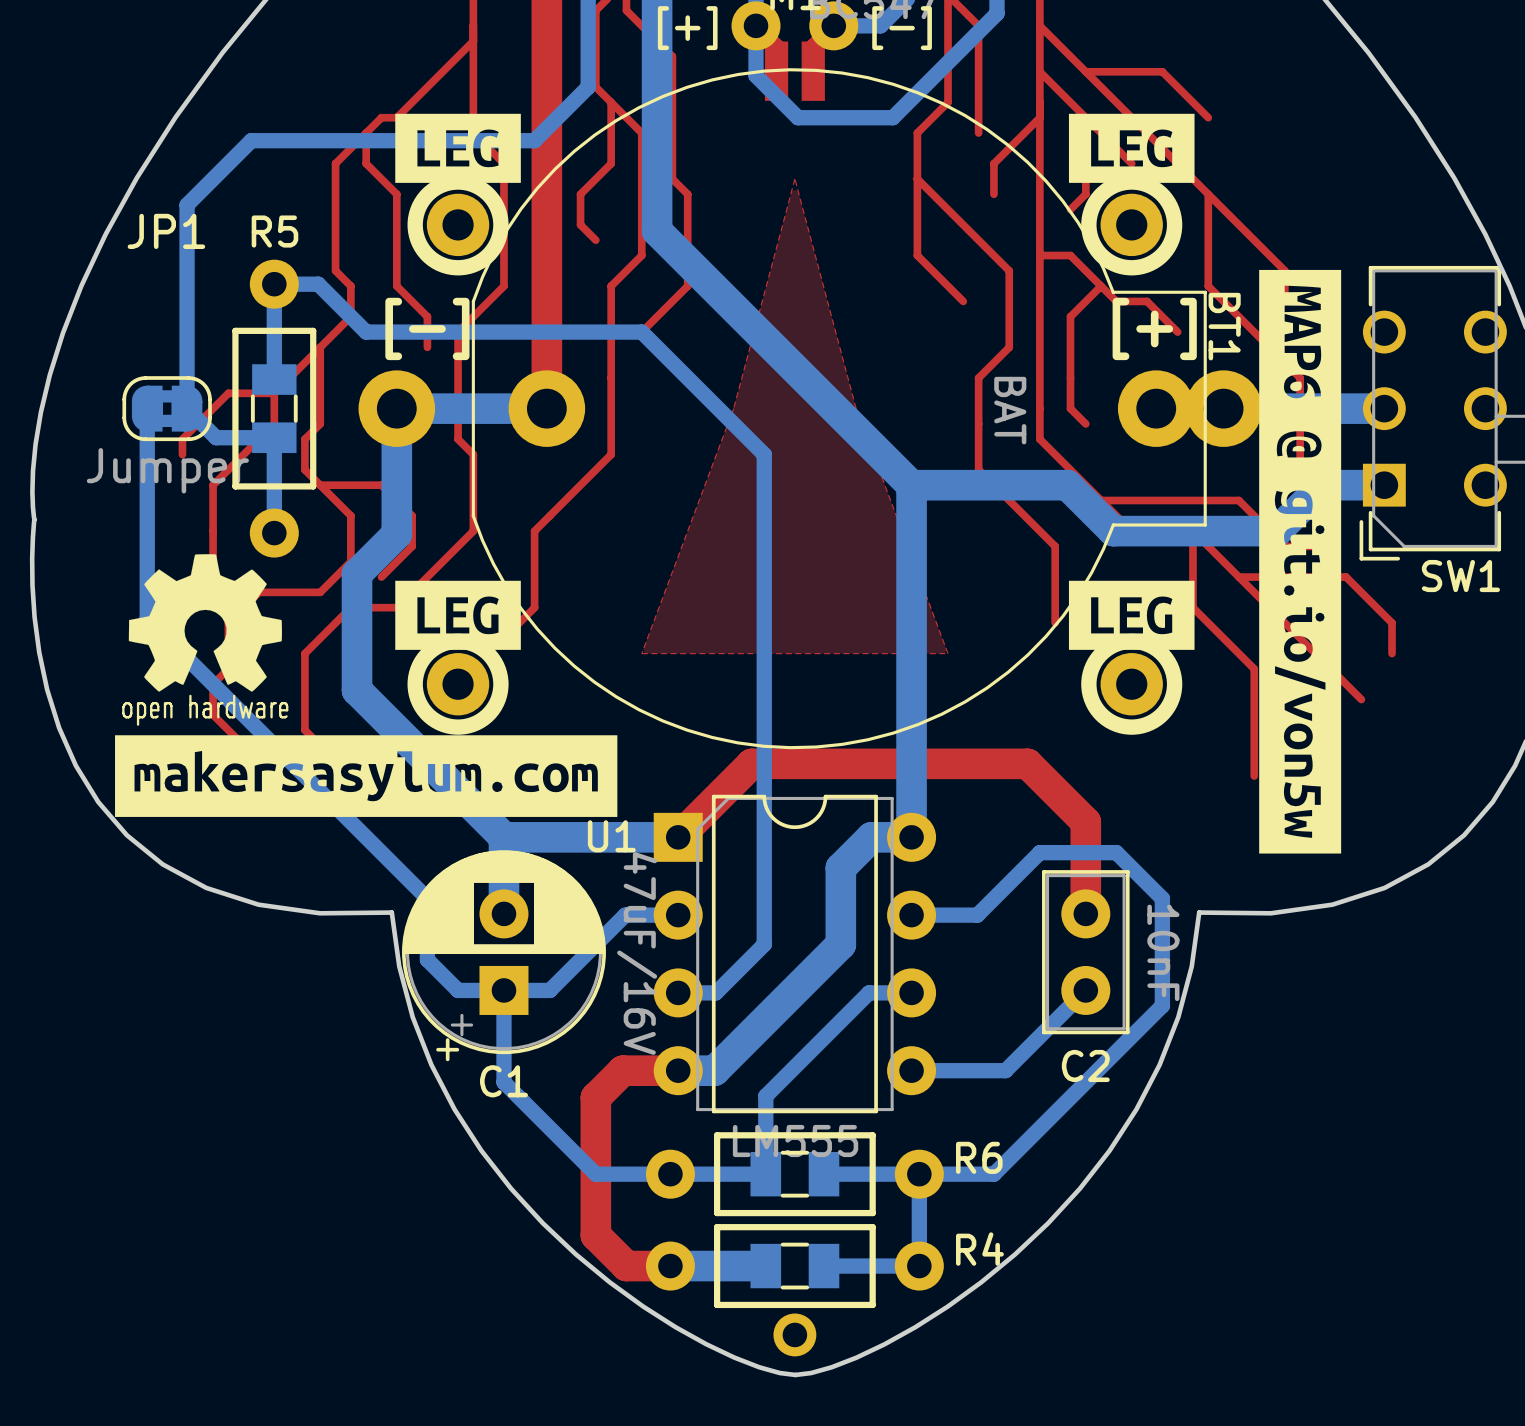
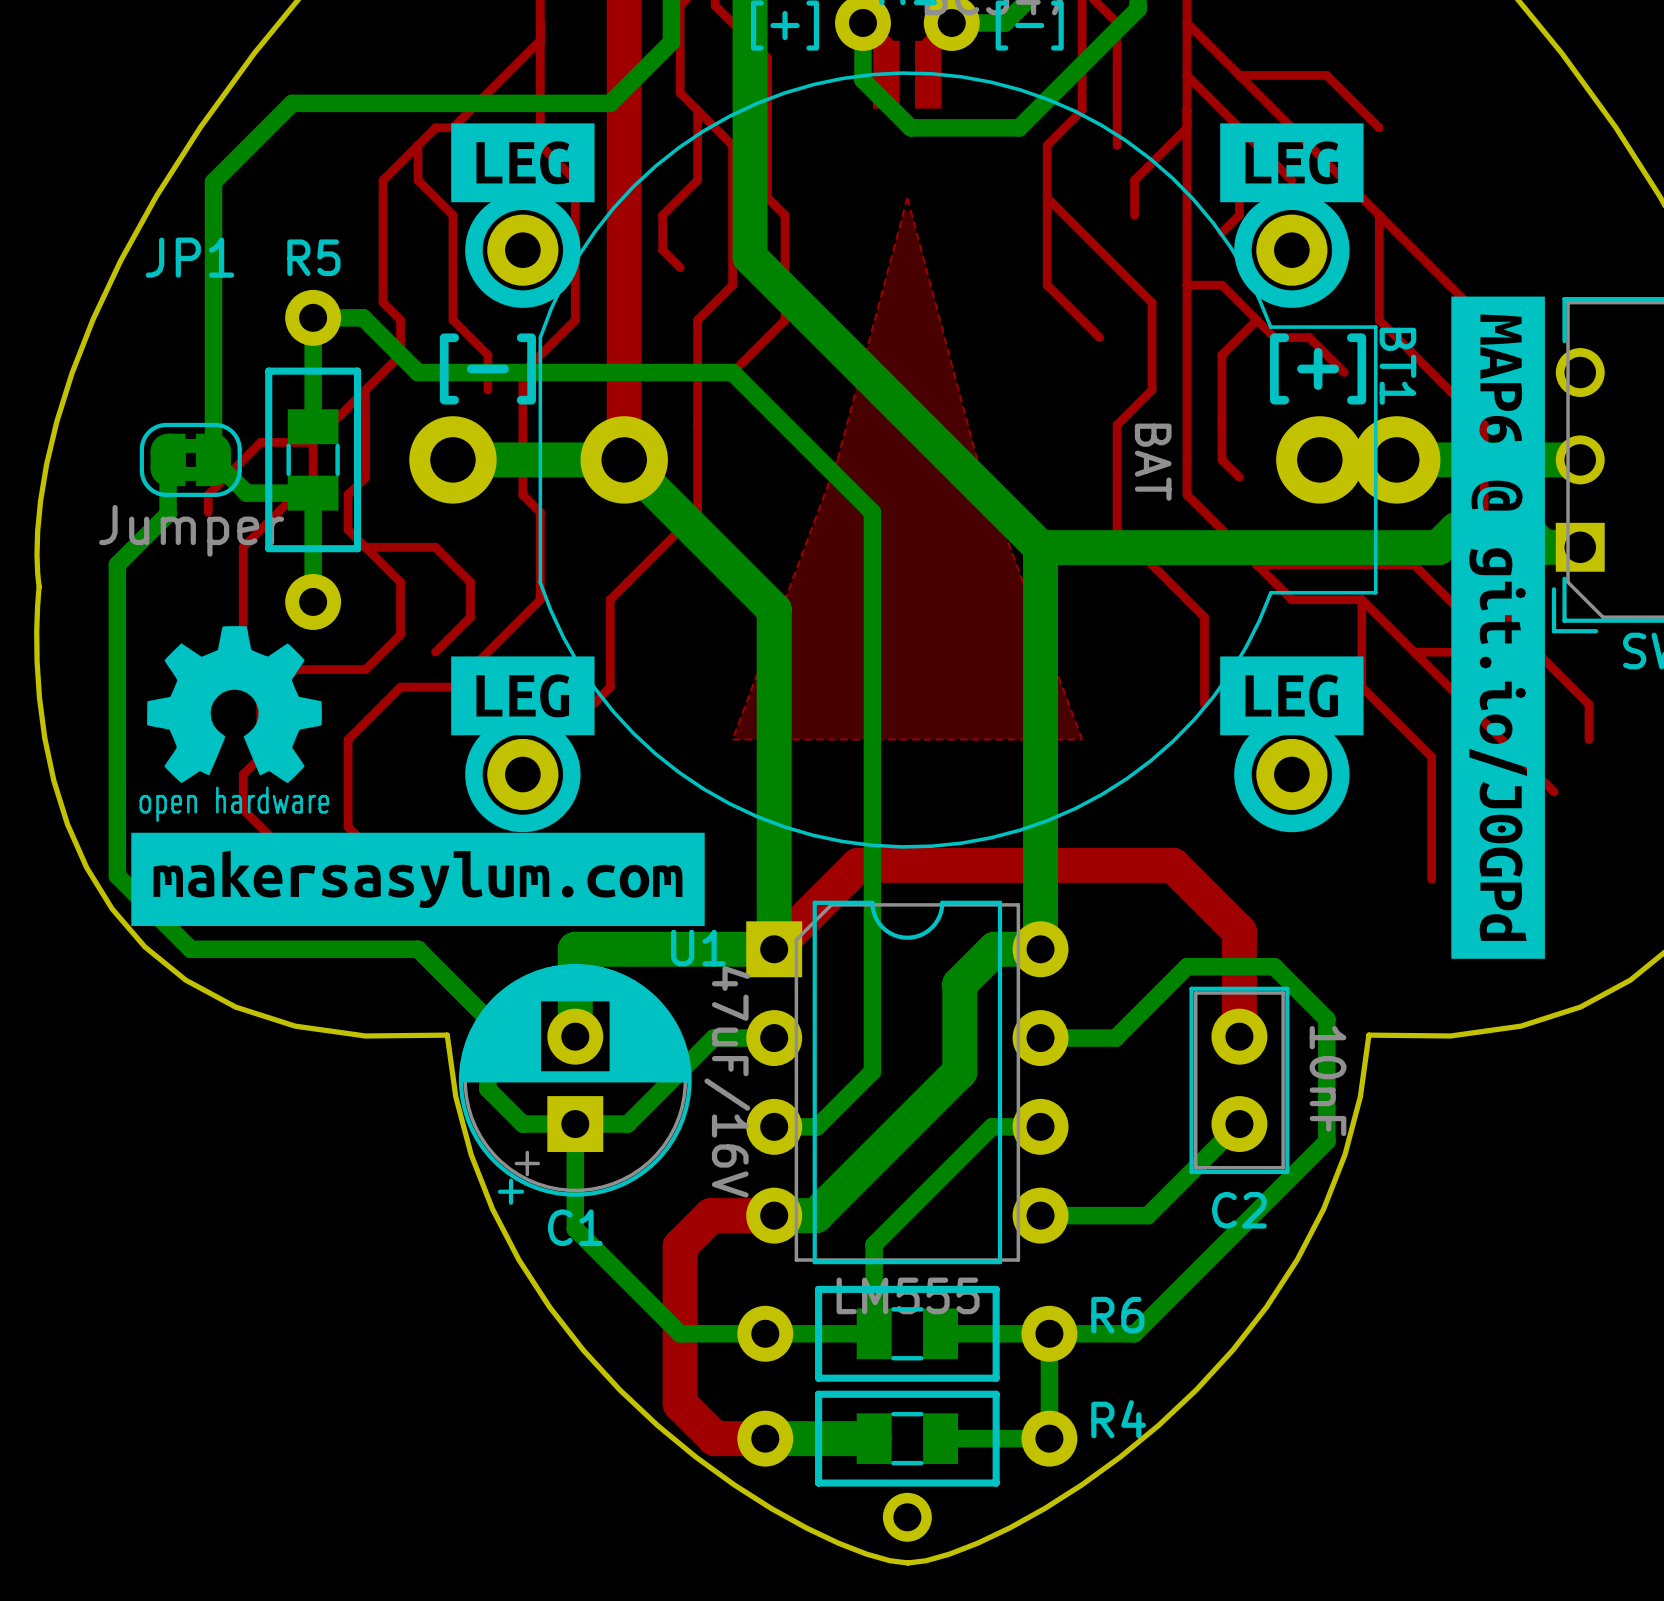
bottom track: (588, 42) (588, 87) (534, 140) (251, 140) (187, 205) -> (671, 42) (610, 103) (292, 103) (213, 182) (213, 227)
drawing shape: [1259, 269, 1342, 854] -> [1451, 296, 1545, 959]
bottom track: (396, 408) (396, 534) (357, 573) (357, 690) (503, 837) -> none
bottom track: none -> (624, 459) (774, 609) (774, 949)
bottom track: (147, 456) (147, 618) (366, 837) -> (168, 514) (117, 564) (117, 875) (190, 949) (418, 949)
bottom track: (1352, 485) (1323, 485) (1277, 531) (1113, 531) (1067, 485) (911, 485) -> (1543, 547) (1526, 529) (1456, 529) (1438, 547) (1040, 547)

